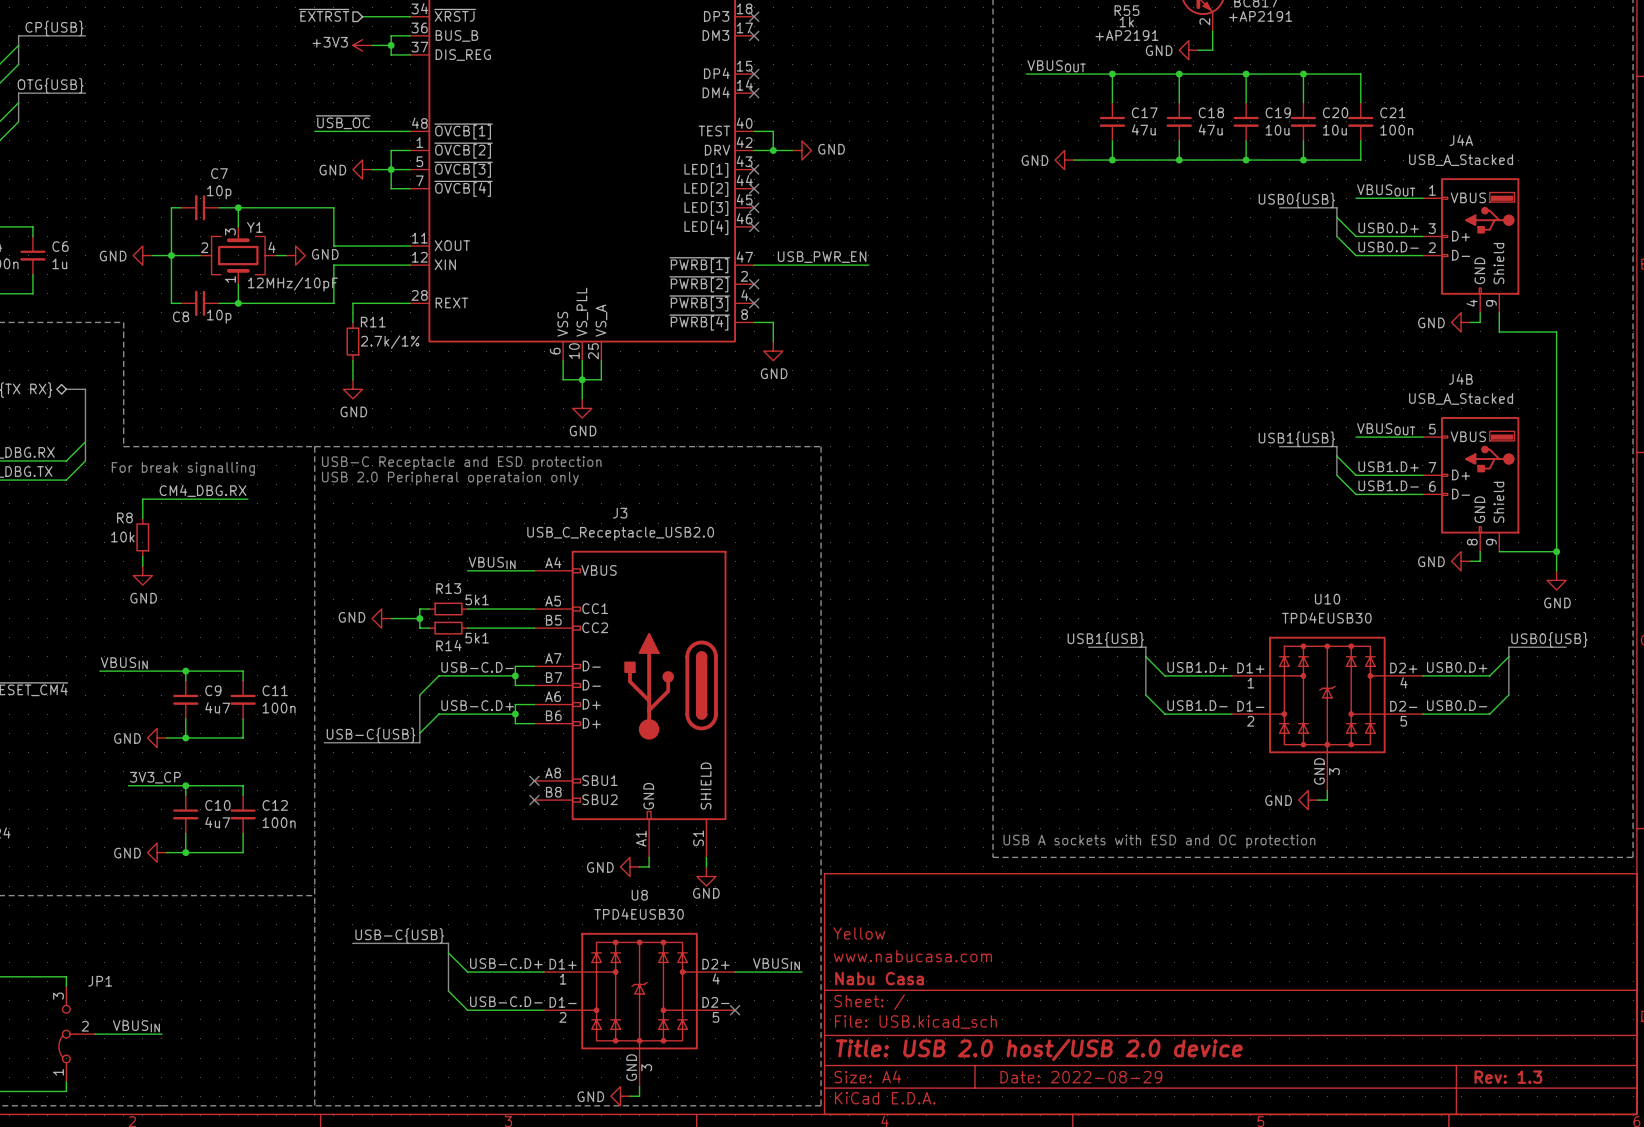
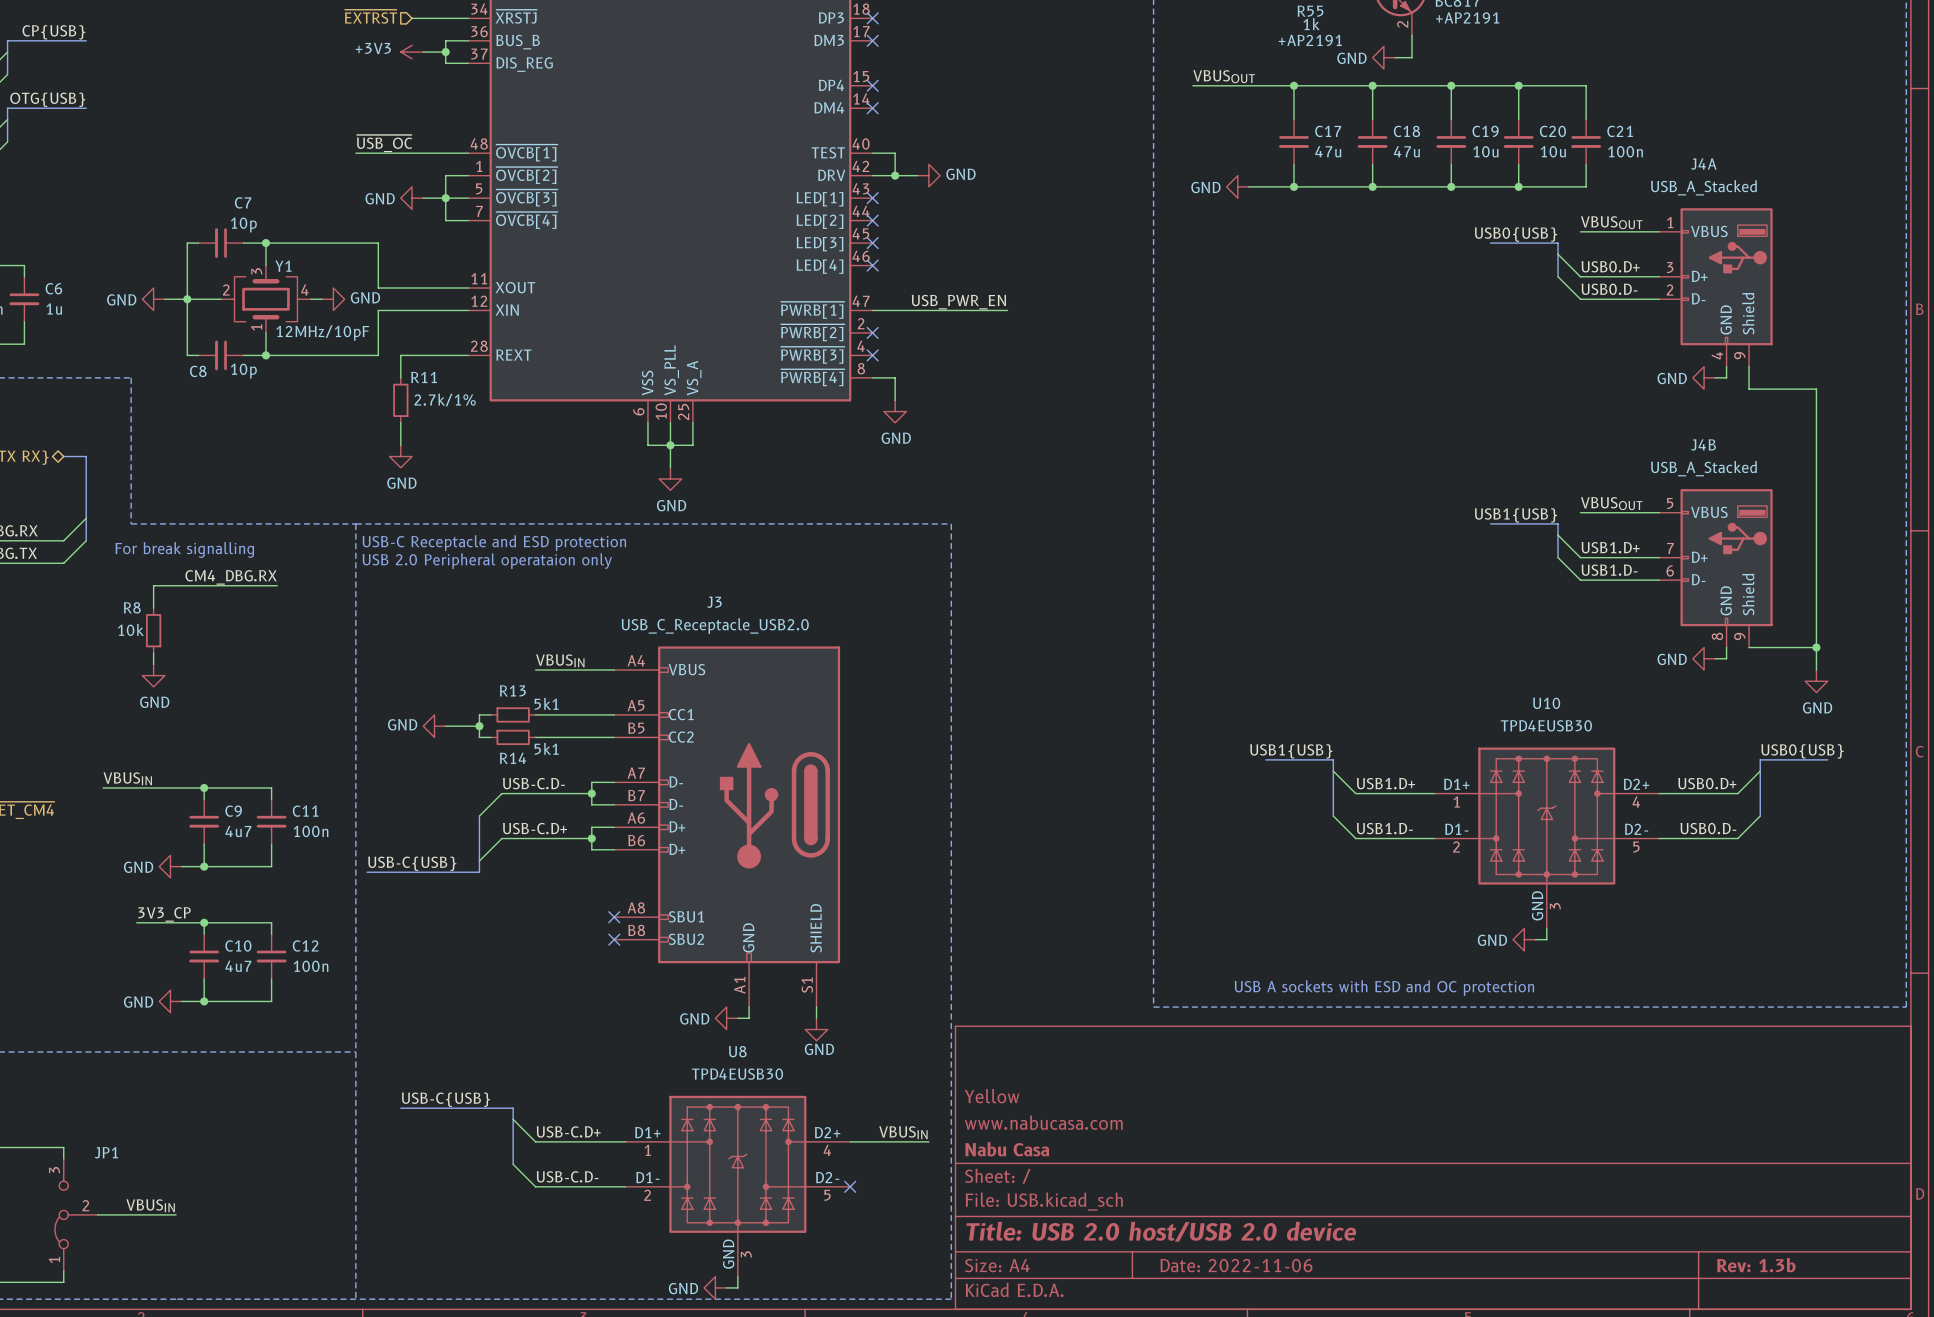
title block: Date: 2022-08-29 (1081, 1077) -> Date: 2022-11-06 (1236, 1265)
title block: Rev: 1.3 (1508, 1077) -> Rev: 1.3b (1756, 1265)

